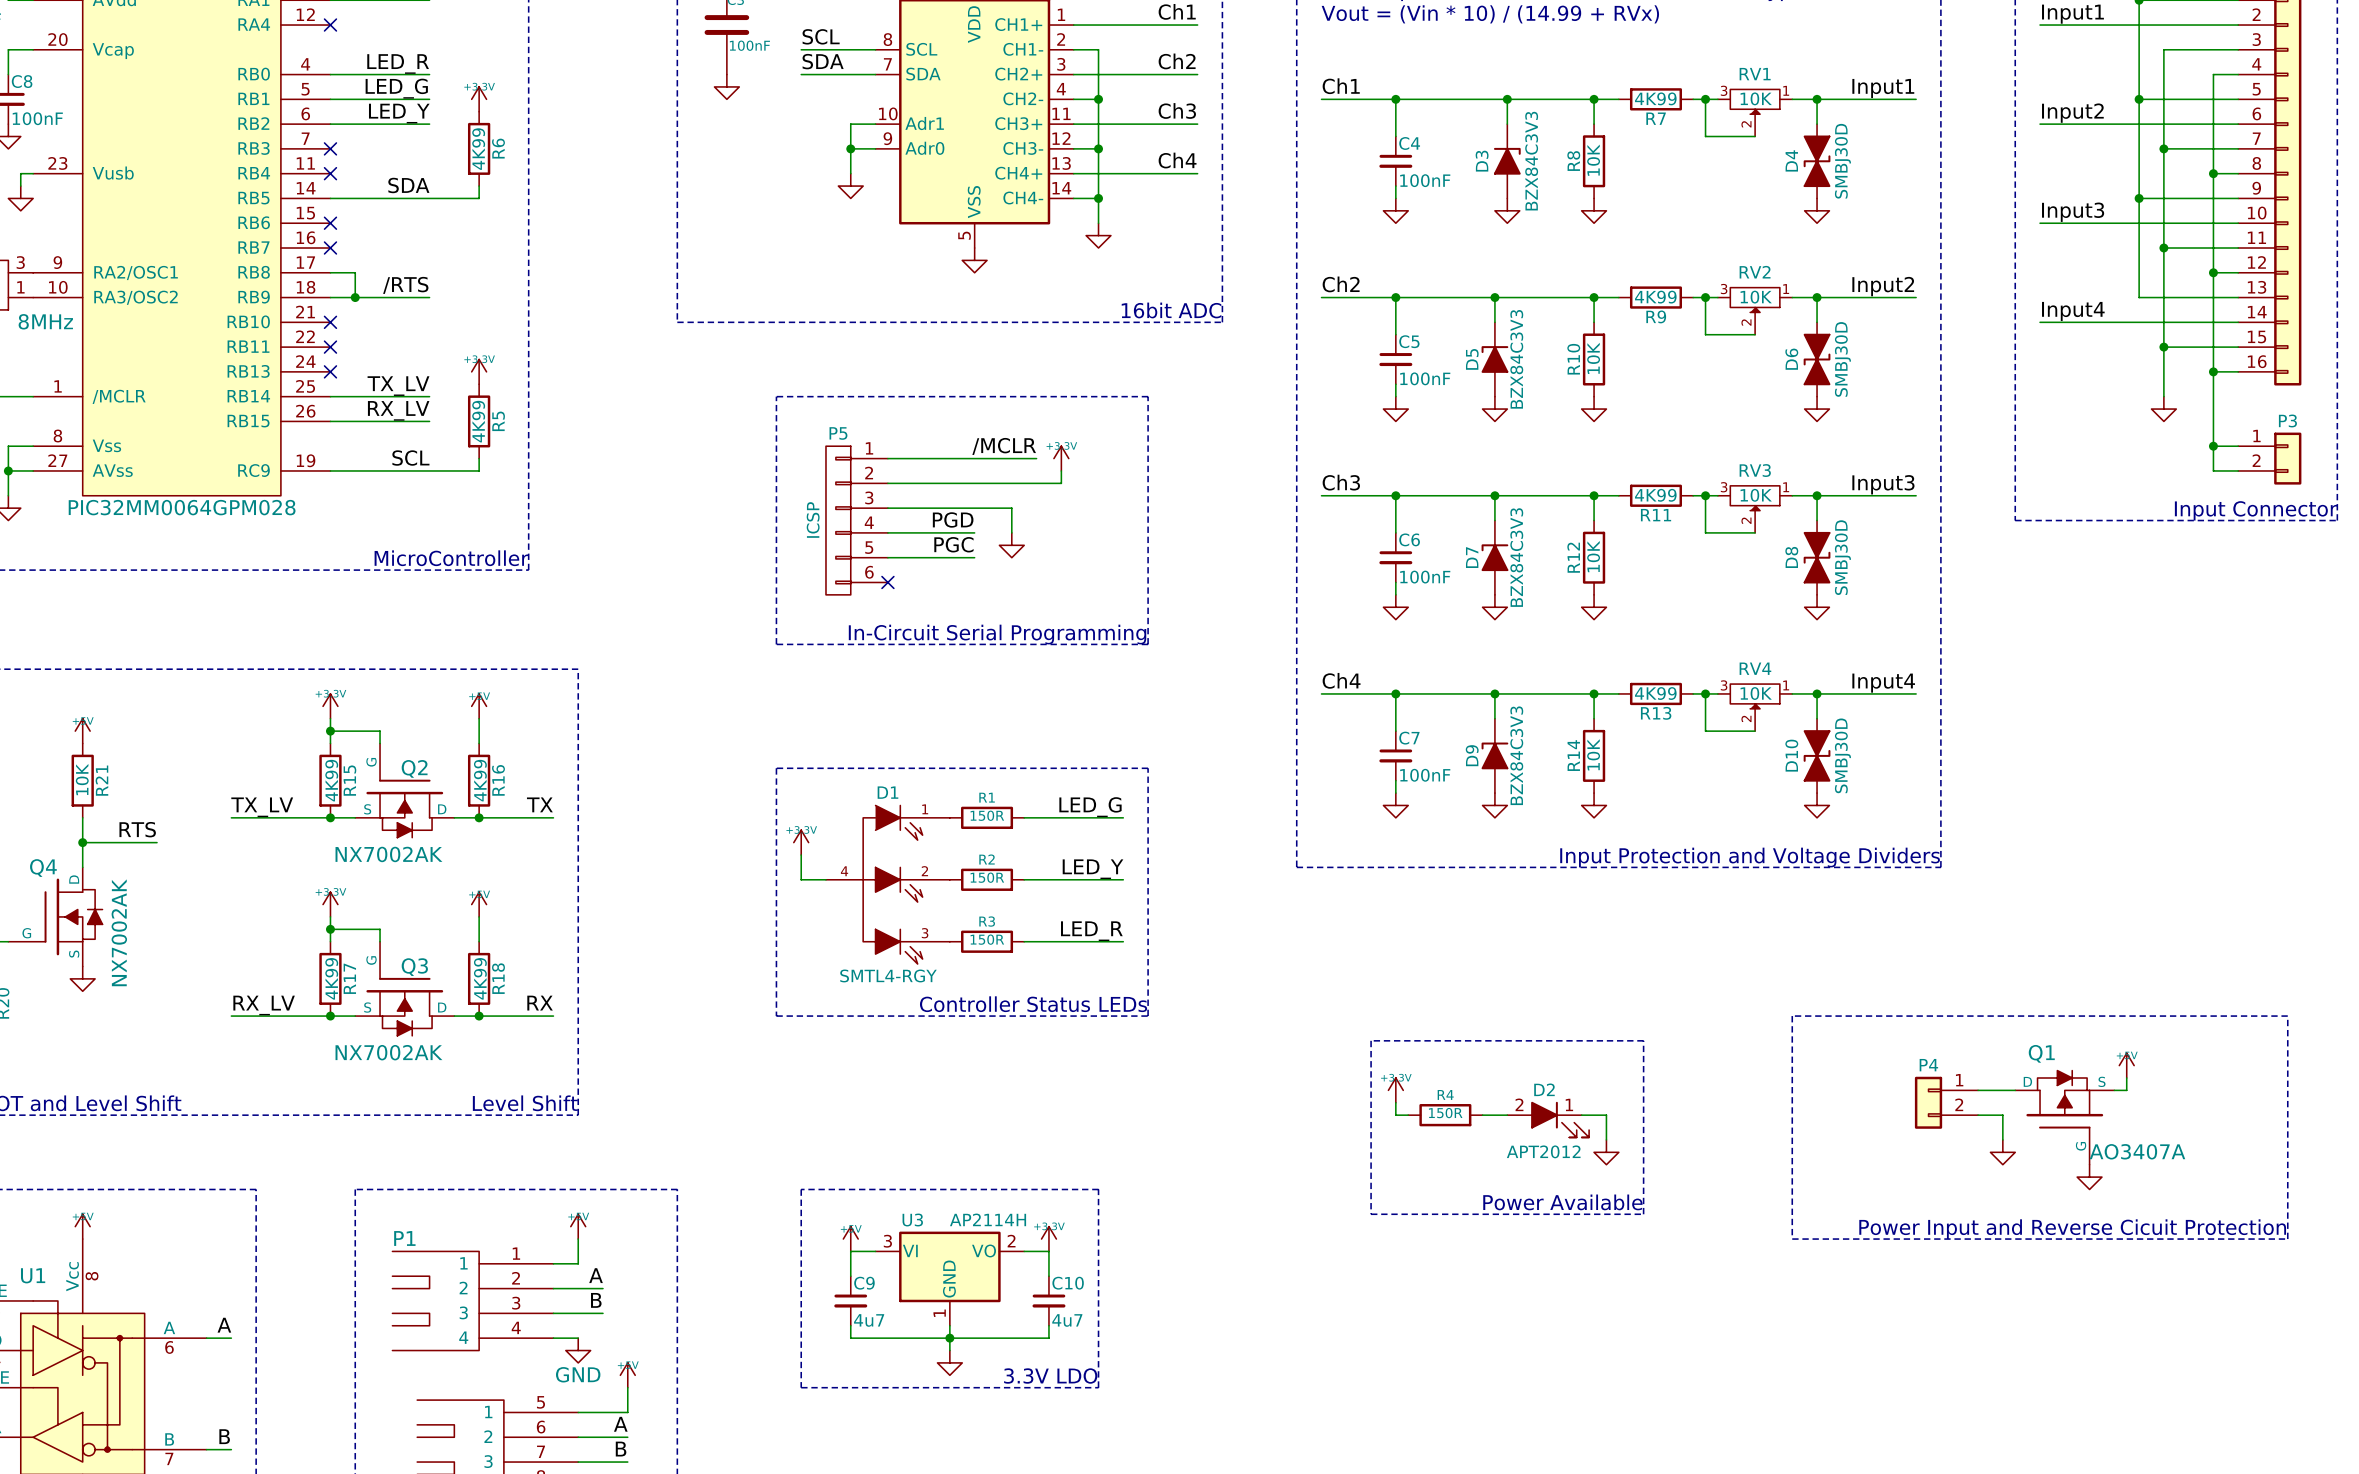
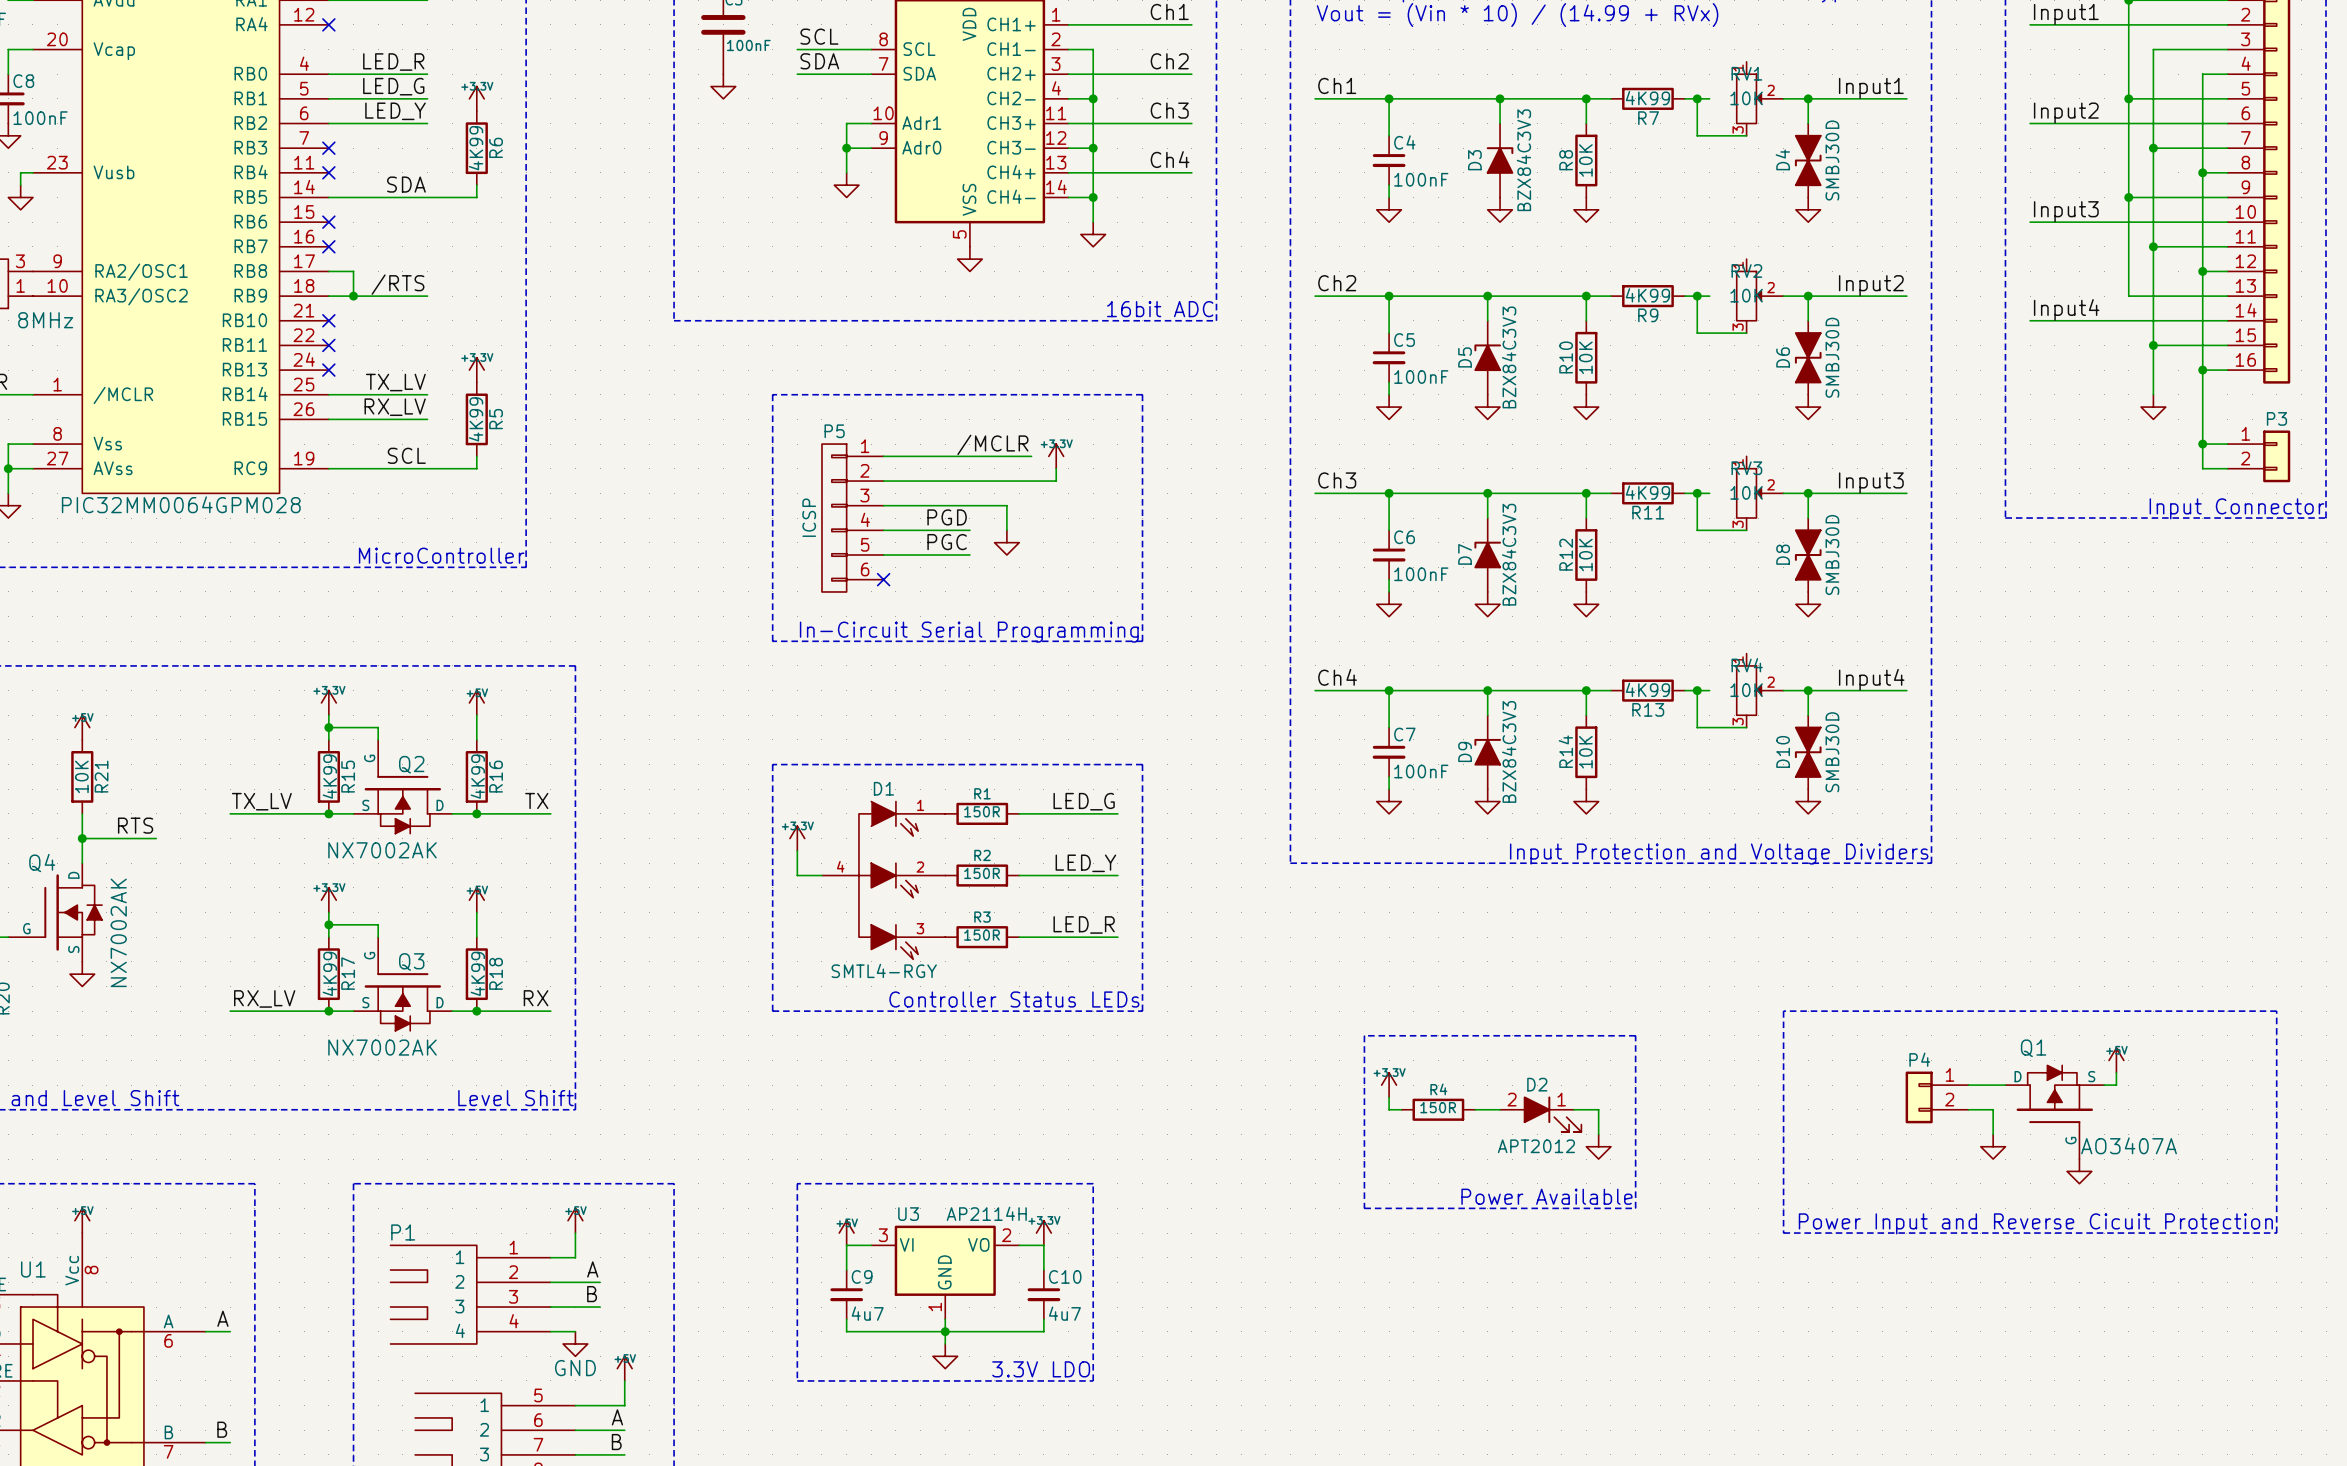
RV1 rotation: 0° (1755, 101) -> 90° counterclockwise (1749, 98)
RV2 rotation: 0° (1755, 300) -> 90° counterclockwise (1749, 296)
RV3 rotation: 0° (1755, 498) -> 90° counterclockwise (1749, 493)
RV4 rotation: 0° (1755, 696) -> 90° counterclockwise (1749, 690)

